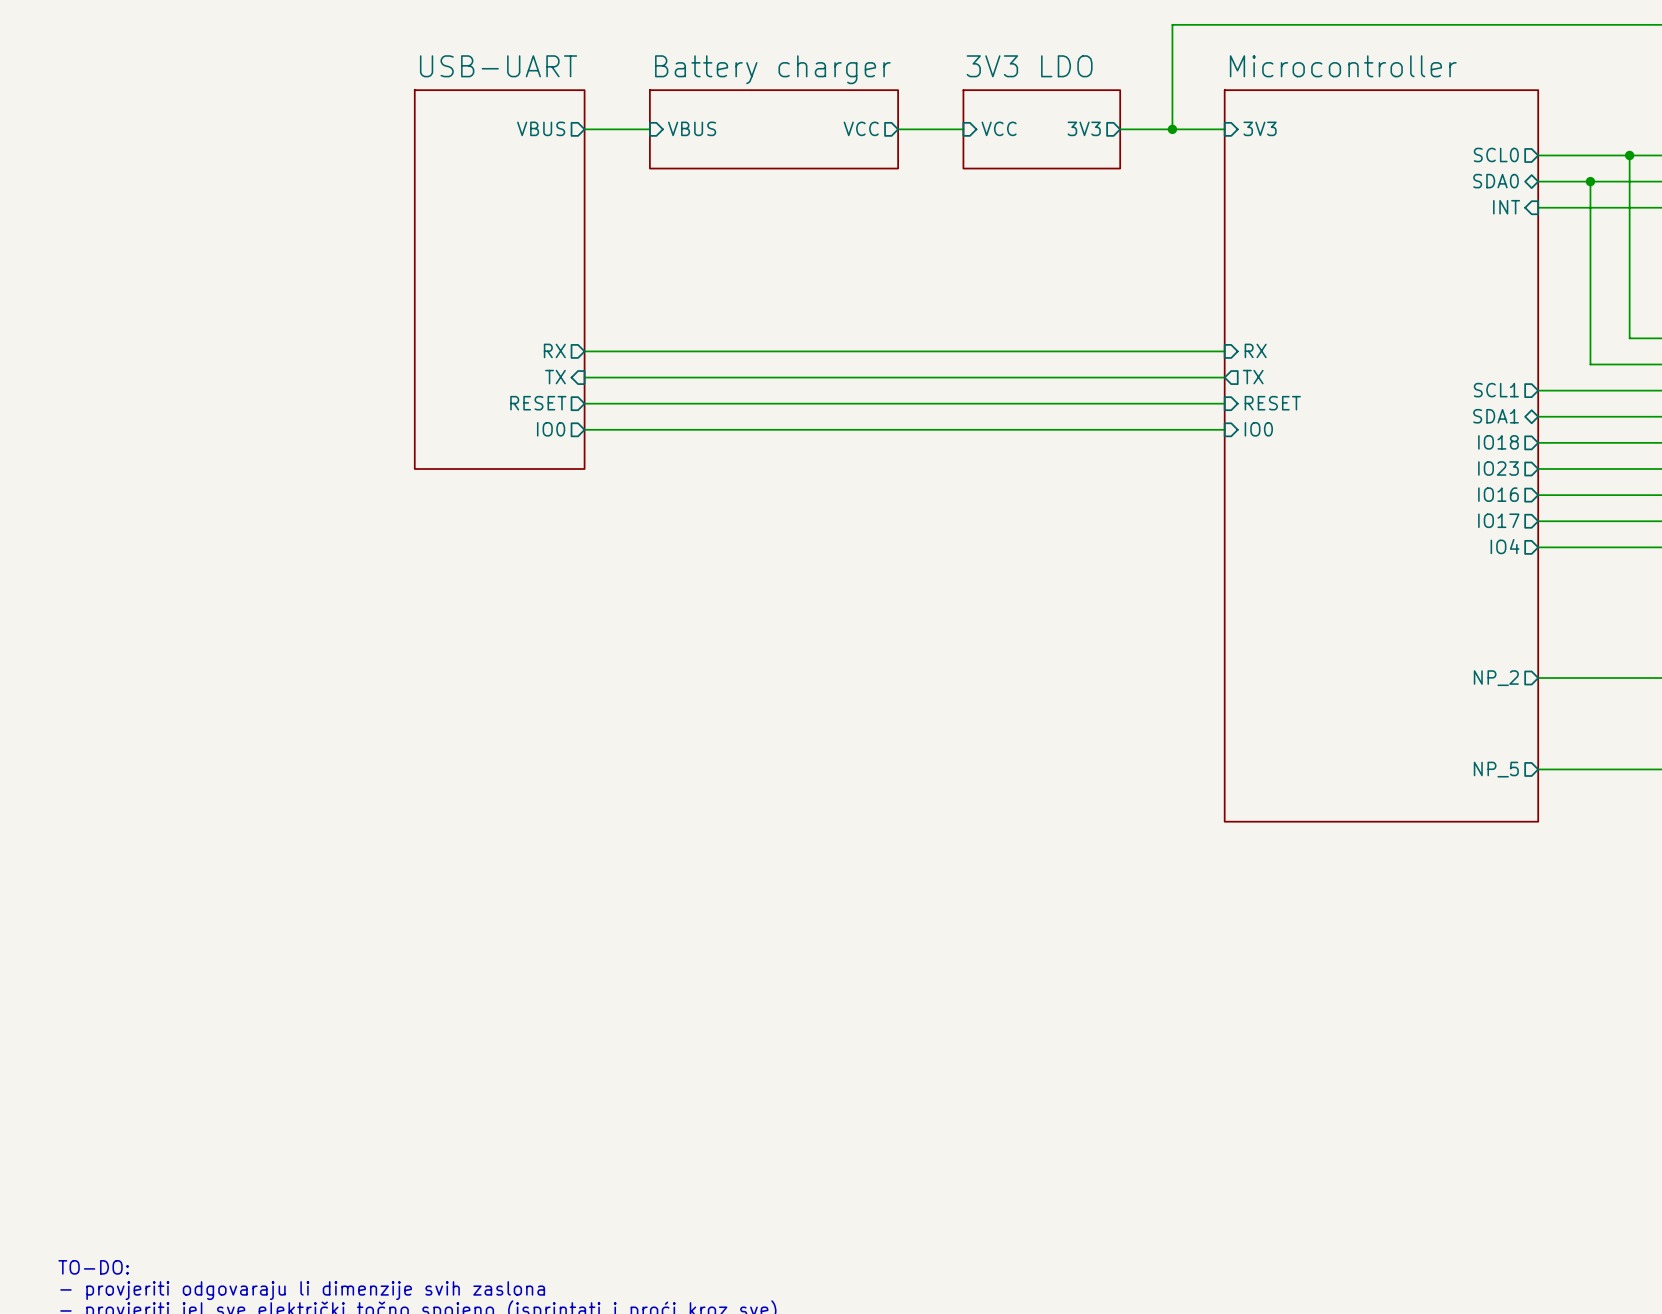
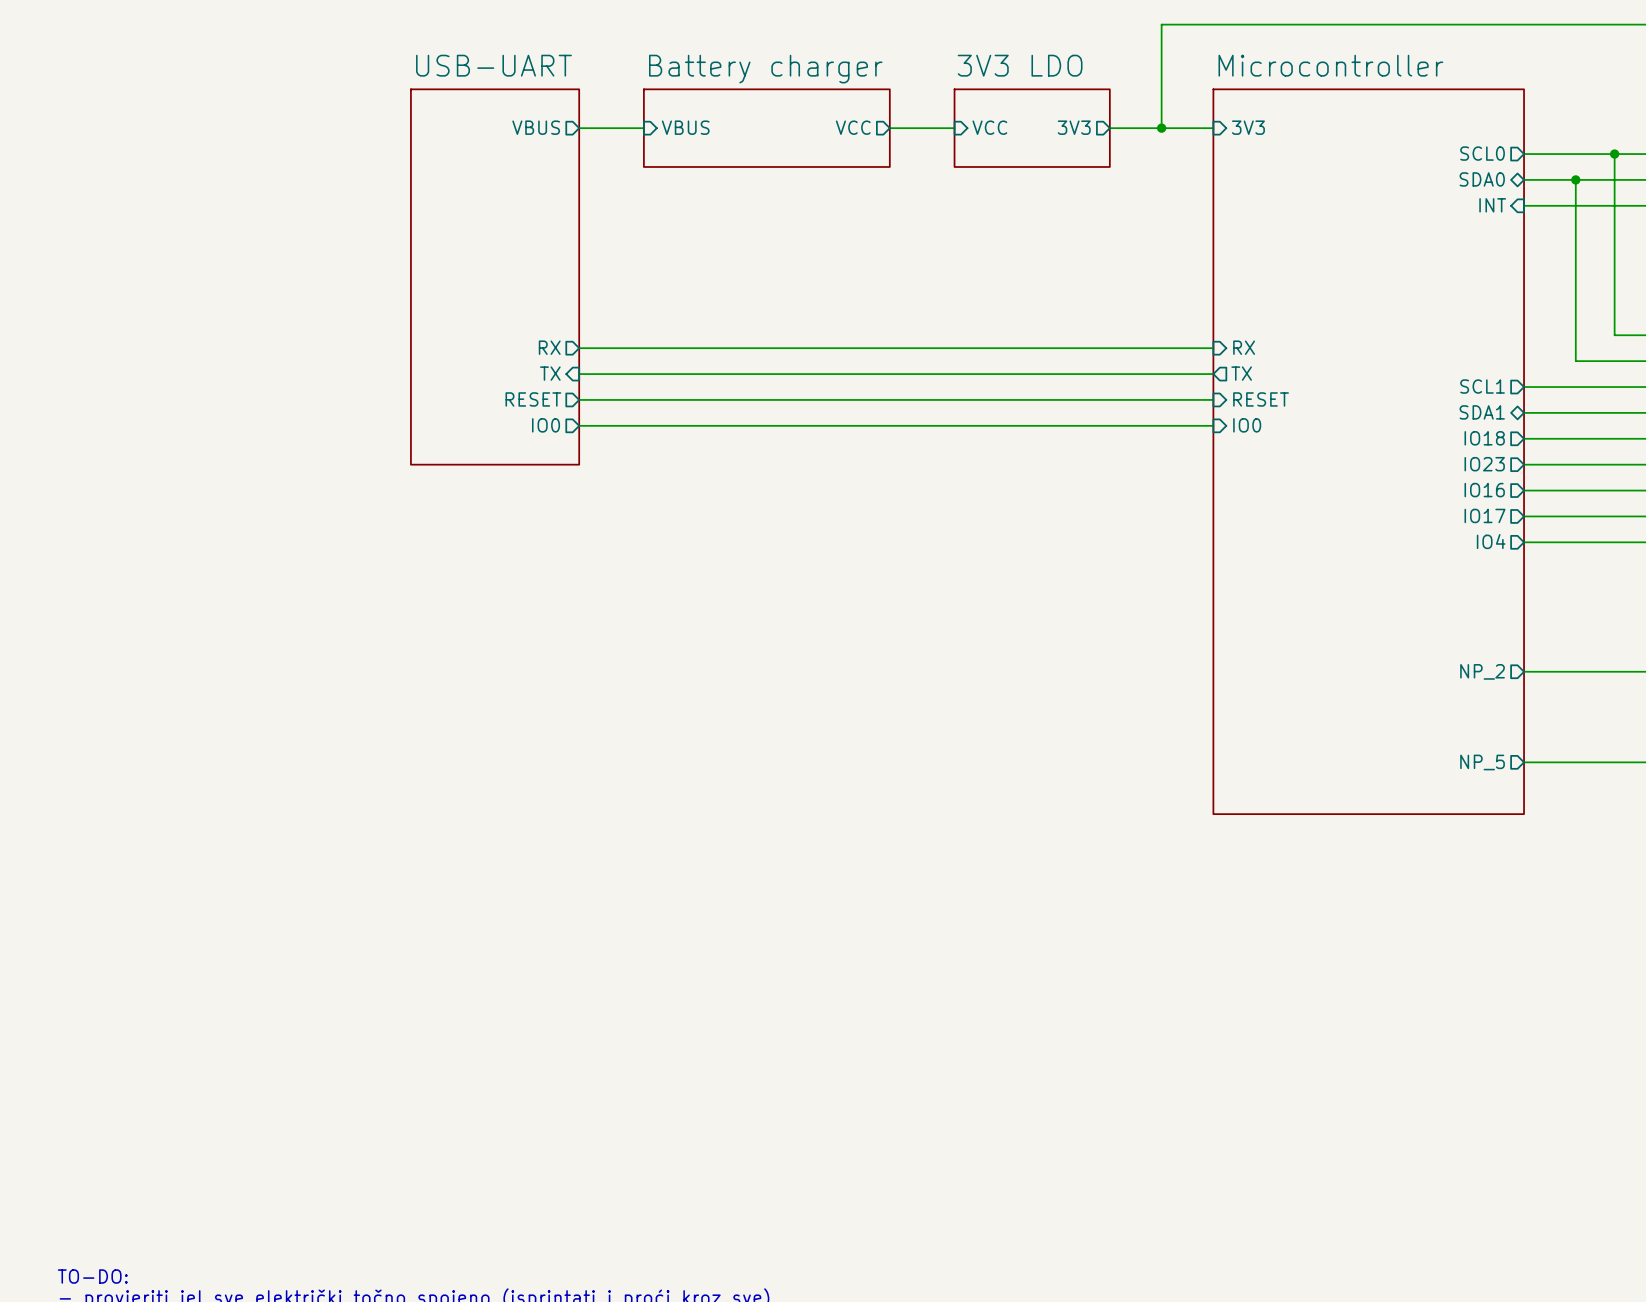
text: TO-DO: (93, 1267) -> none
text: - provjeriti odgovaraju li dimenzije svih zaslona (302, 1290) -> TO-DO: (92, 1276)

